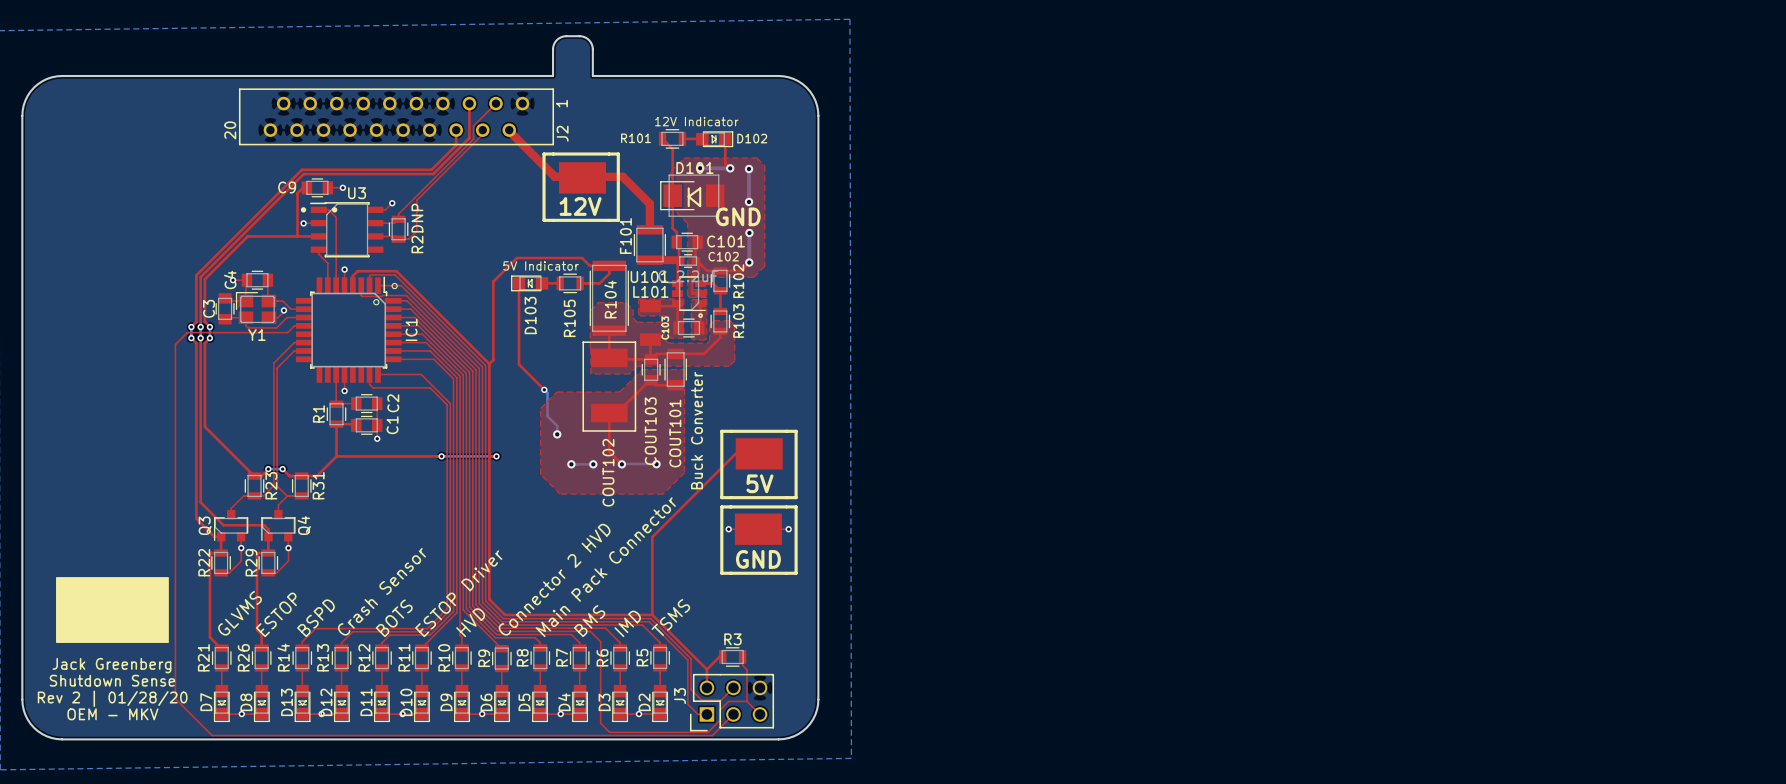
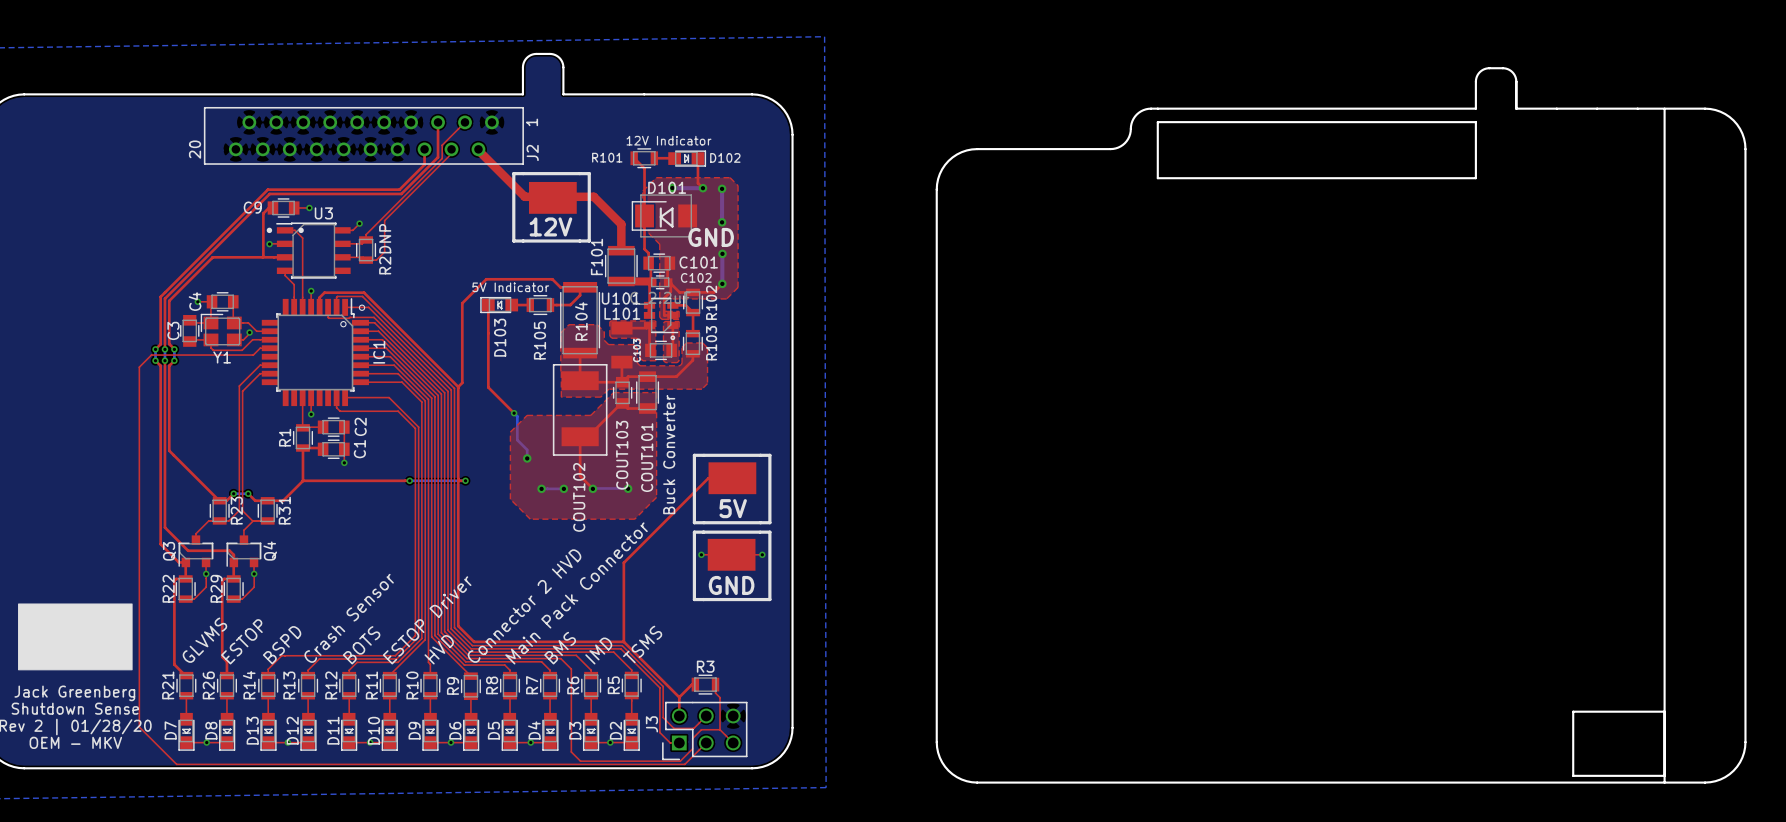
board edge: none -> (1489, 68) (1506, 68) (1514, 74) (1516, 108) (1710, 109) (1729, 117) (1742, 133) (1745, 149) (1745, 742) (1742, 757) (1737, 766) (1720, 779) (1705, 782) (977, 782) (961, 779) (952, 774) (942, 762) (936, 742) (936, 189) (939, 174) (945, 164) (956, 154) (971, 149) (1115, 148) (1122, 144) (1128, 138) (1135, 116) (1140, 111) (1148, 108) (1475, 108) (1476, 78) (1481, 71) (1489, 68)
board edge: none -> (1664, 108) (1664, 782)
board edge: none -> (1157, 122) (1475, 122) (1475, 178) (1157, 178) (1157, 122)
board edge: none -> (1664, 711) (1573, 711) (1573, 775) (1664, 775)

